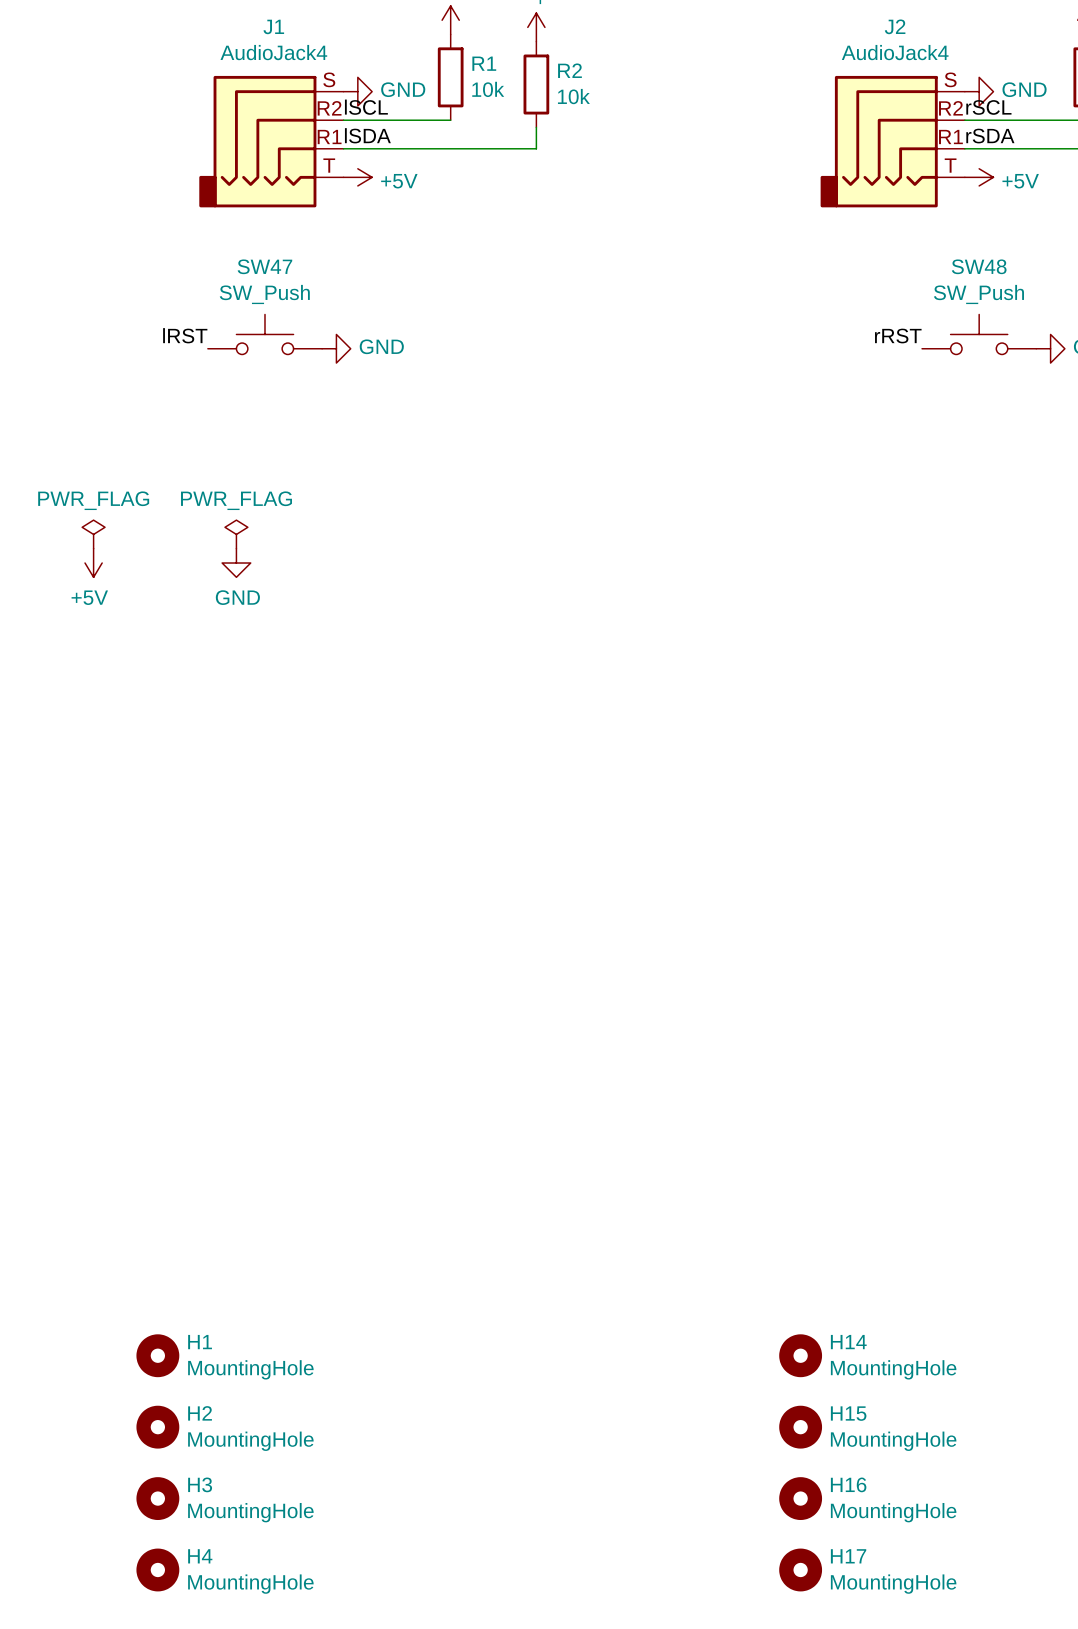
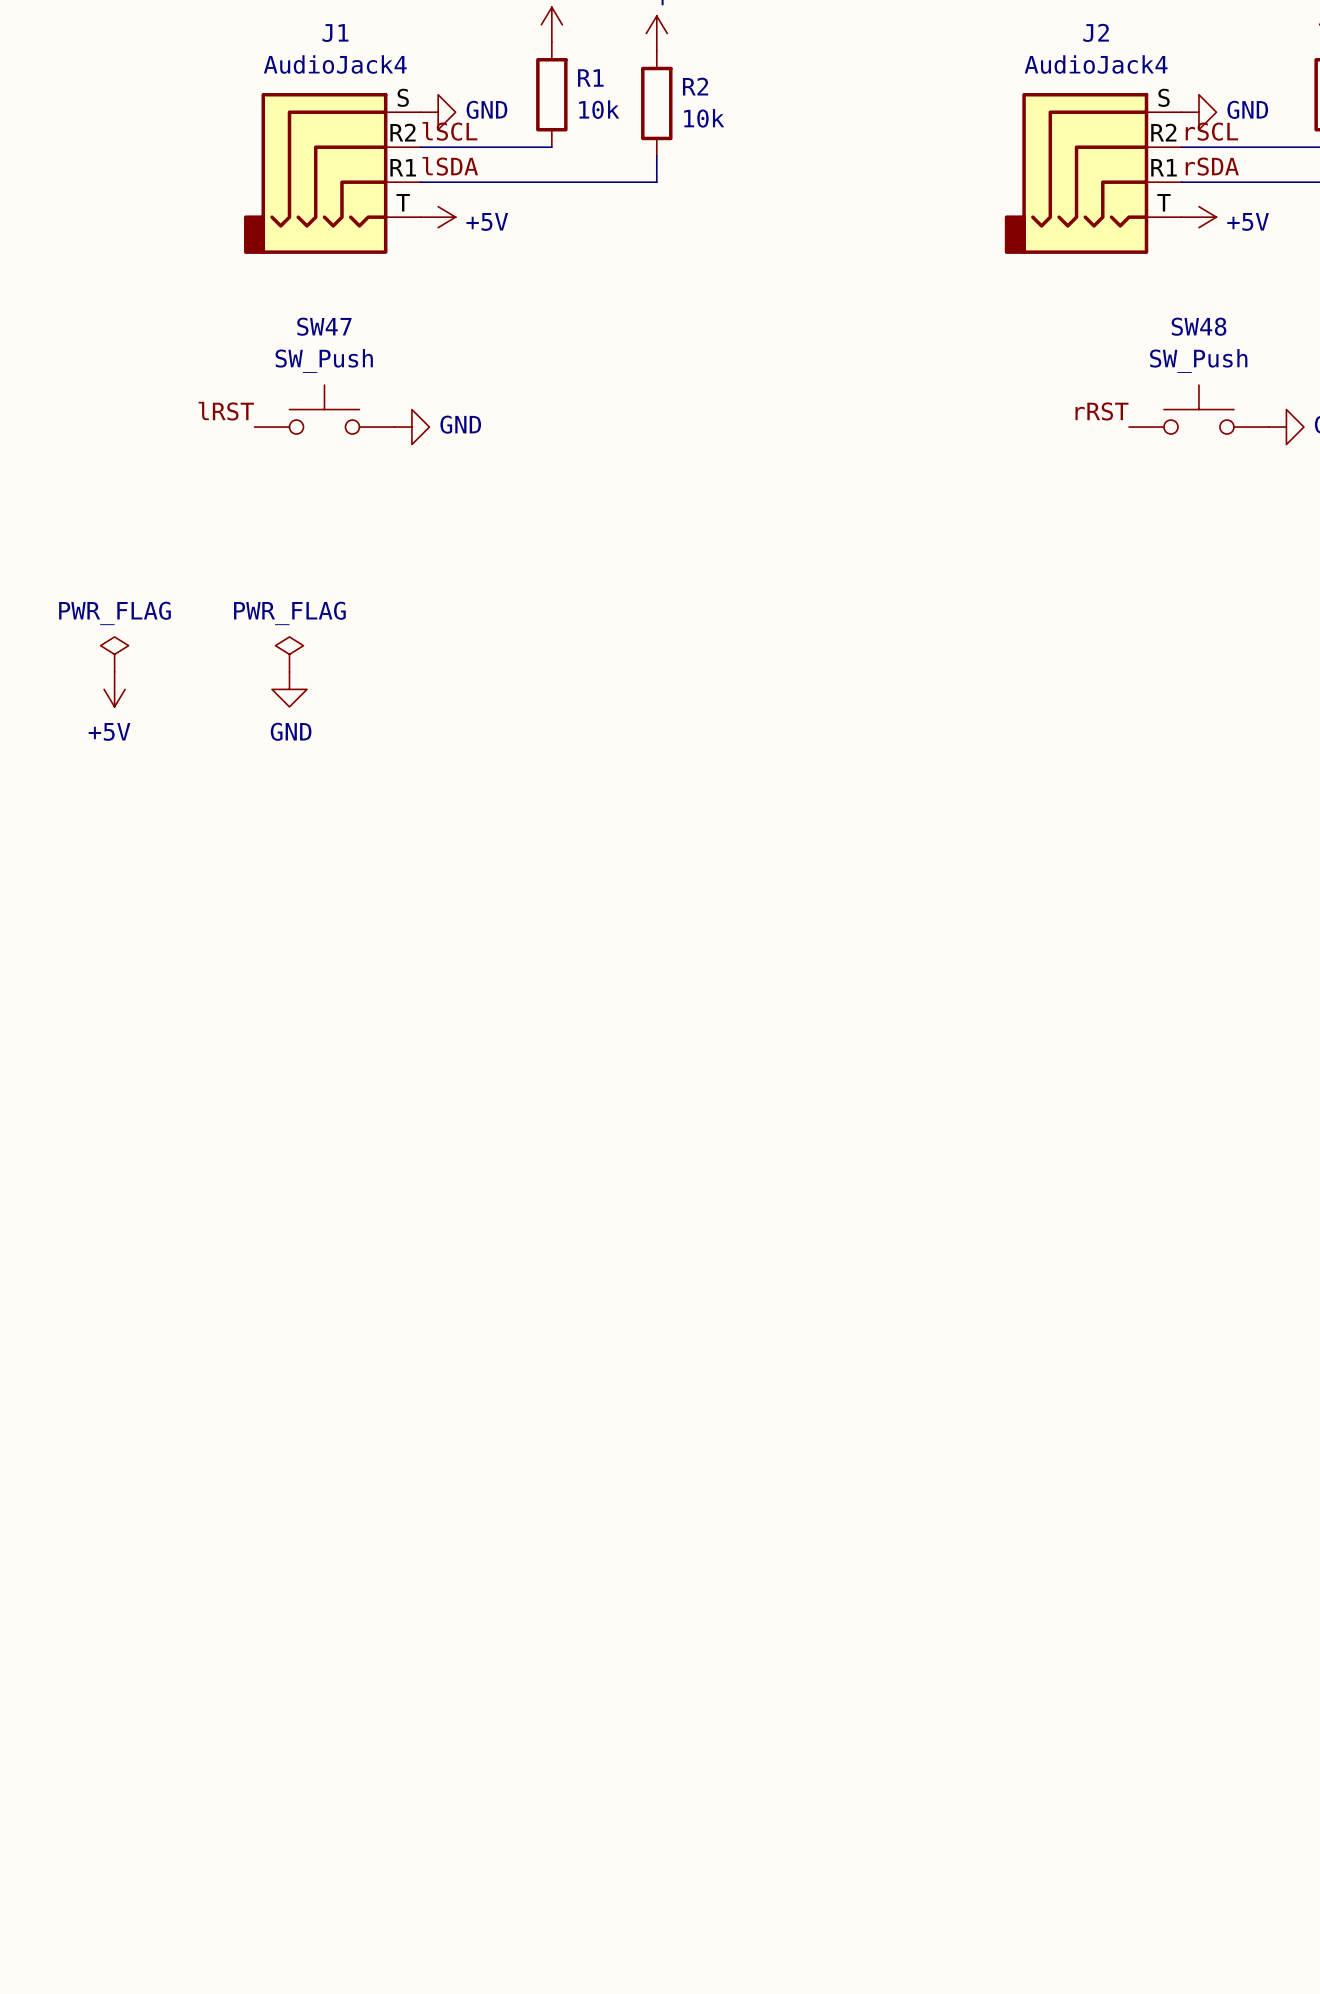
H1: MountingHole (157, 1355) -> none
H14: MountingHole (800, 1355) -> none
H2: MountingHole (157, 1427) -> none
H15: MountingHole (800, 1427) -> none
H3: MountingHole (157, 1498) -> none
H16: MountingHole (800, 1498) -> none
H4: MountingHole (157, 1569) -> none
H17: MountingHole (800, 1569) -> none

